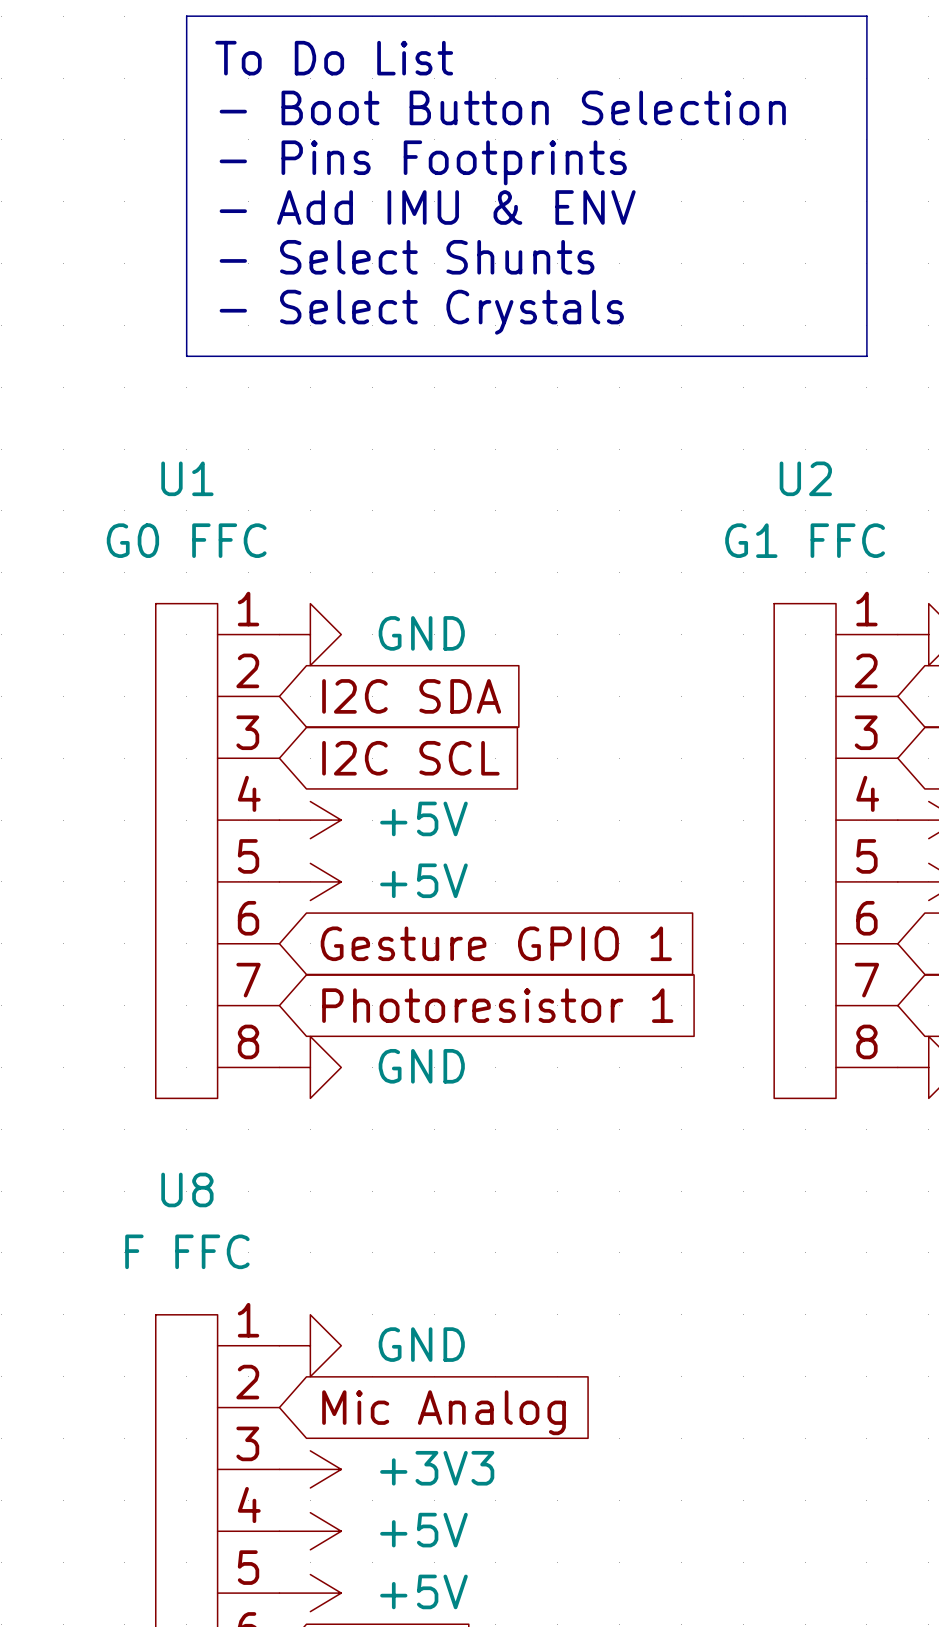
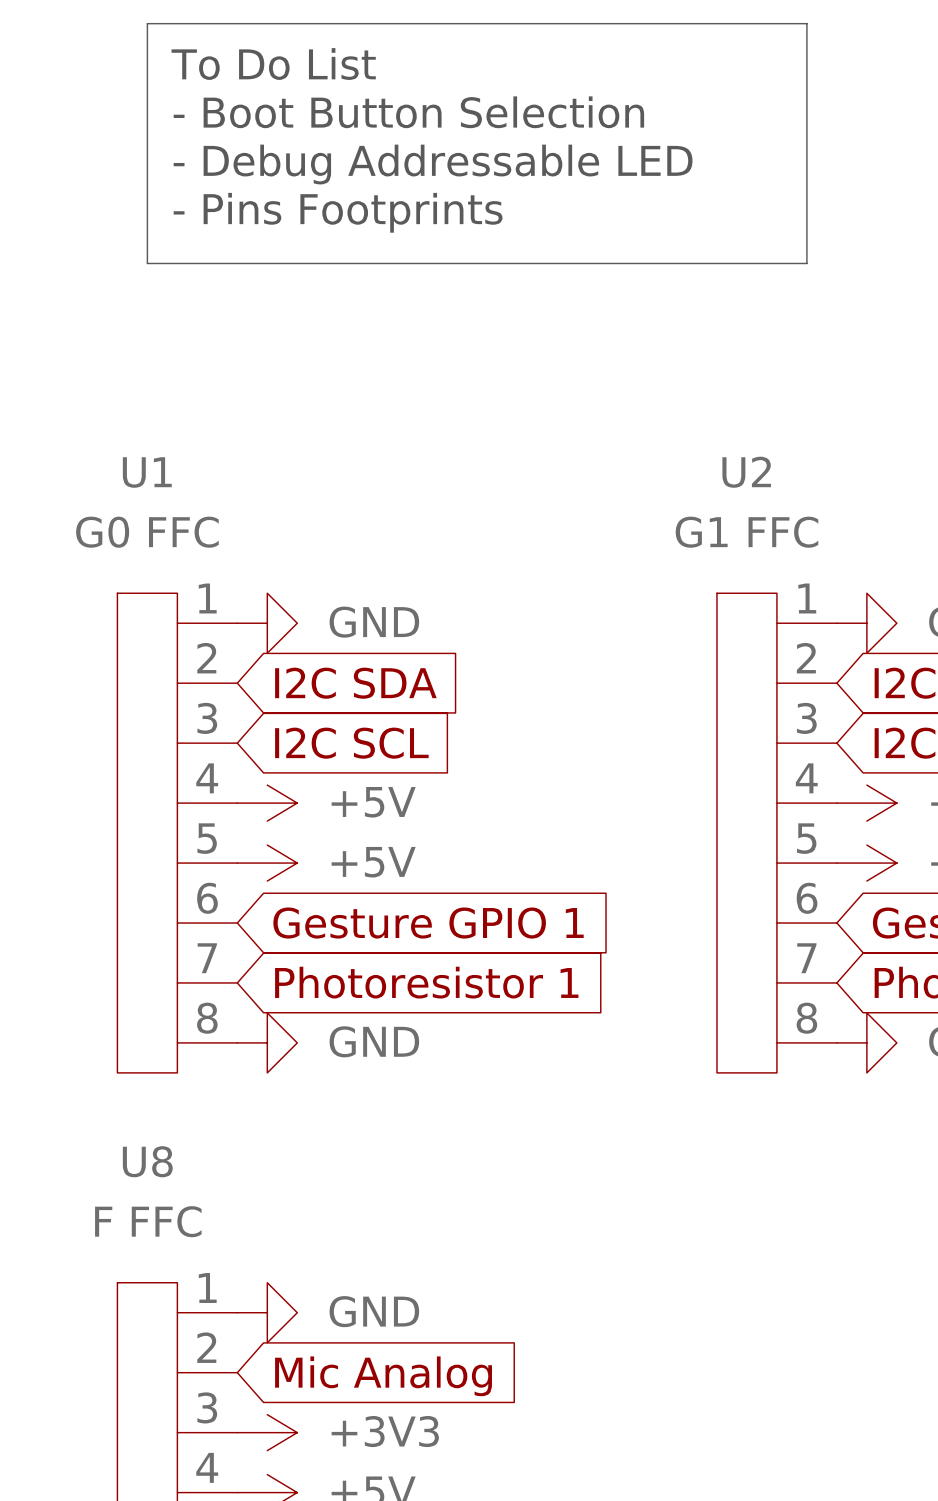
text: - Pins Footprints (423, 162) -> - Debug Addressable LED (433, 164)
text: - Add IMU & ENV (427, 207) -> - Pins Footprints (338, 212)
text: - Select Shunts (407, 257) -> none
line: (186, 263) (186, 356) (866, 356) (866, 263) -> (147, 263) (806, 263)
text: - Select Crystals (421, 312) -> none

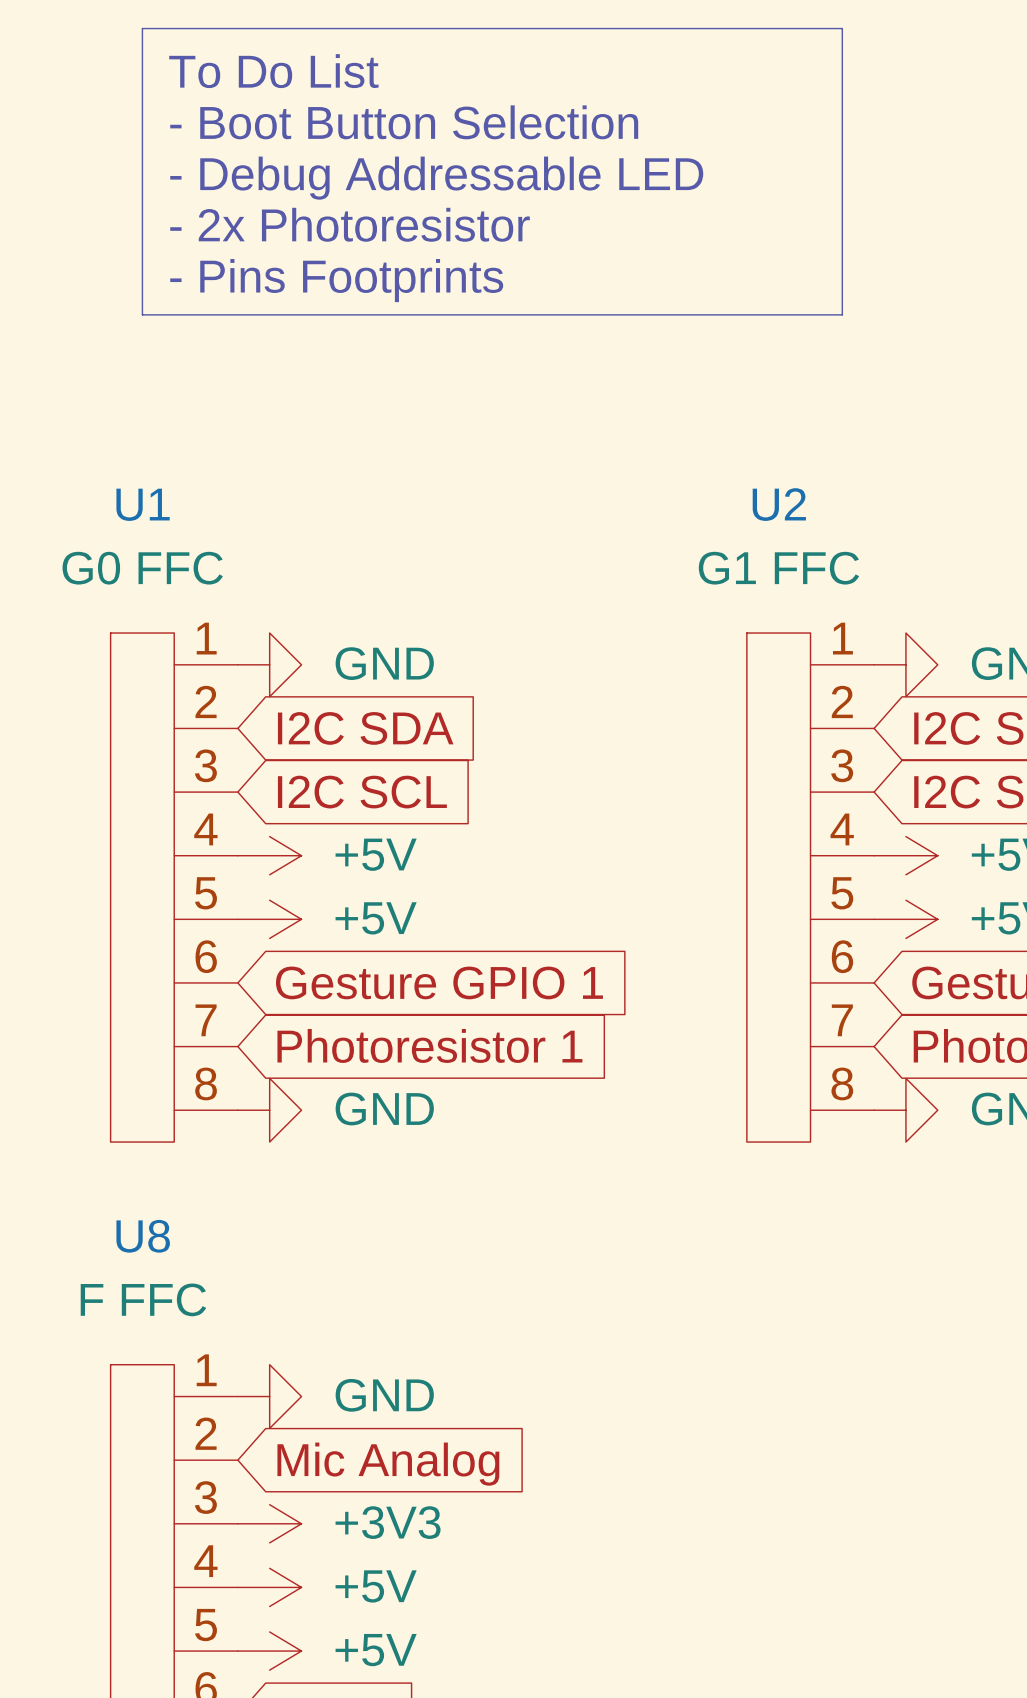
text: - Pins Footprints (338, 212) -> - 2x Photoresistor (350, 224)
text: none -> - Pins Footprints (336, 280)
line: (147, 263) (806, 263) -> (142, 283) (142, 314) (842, 314) (842, 283)

